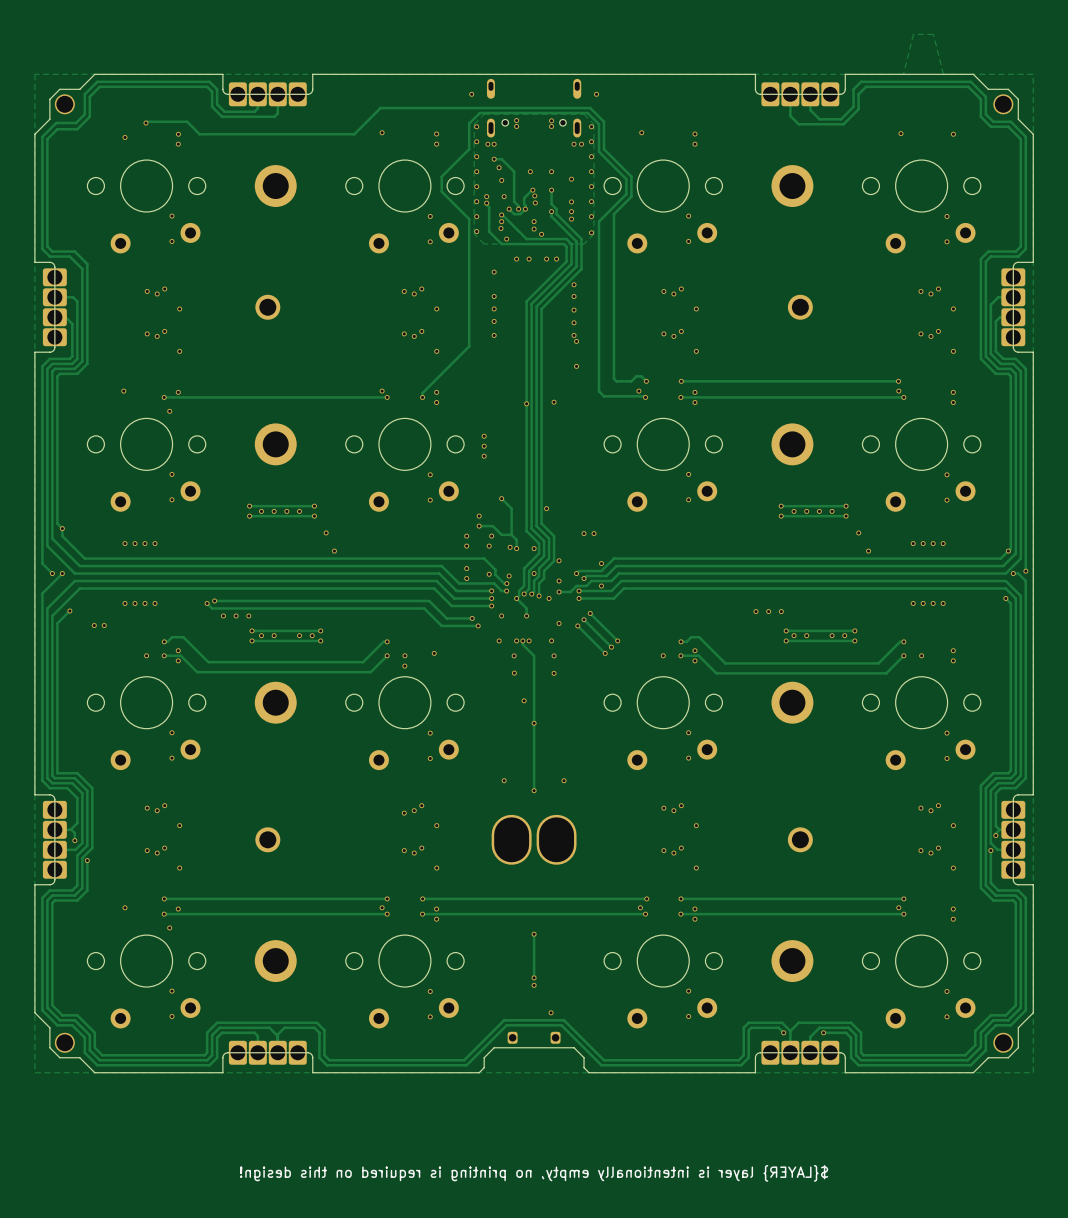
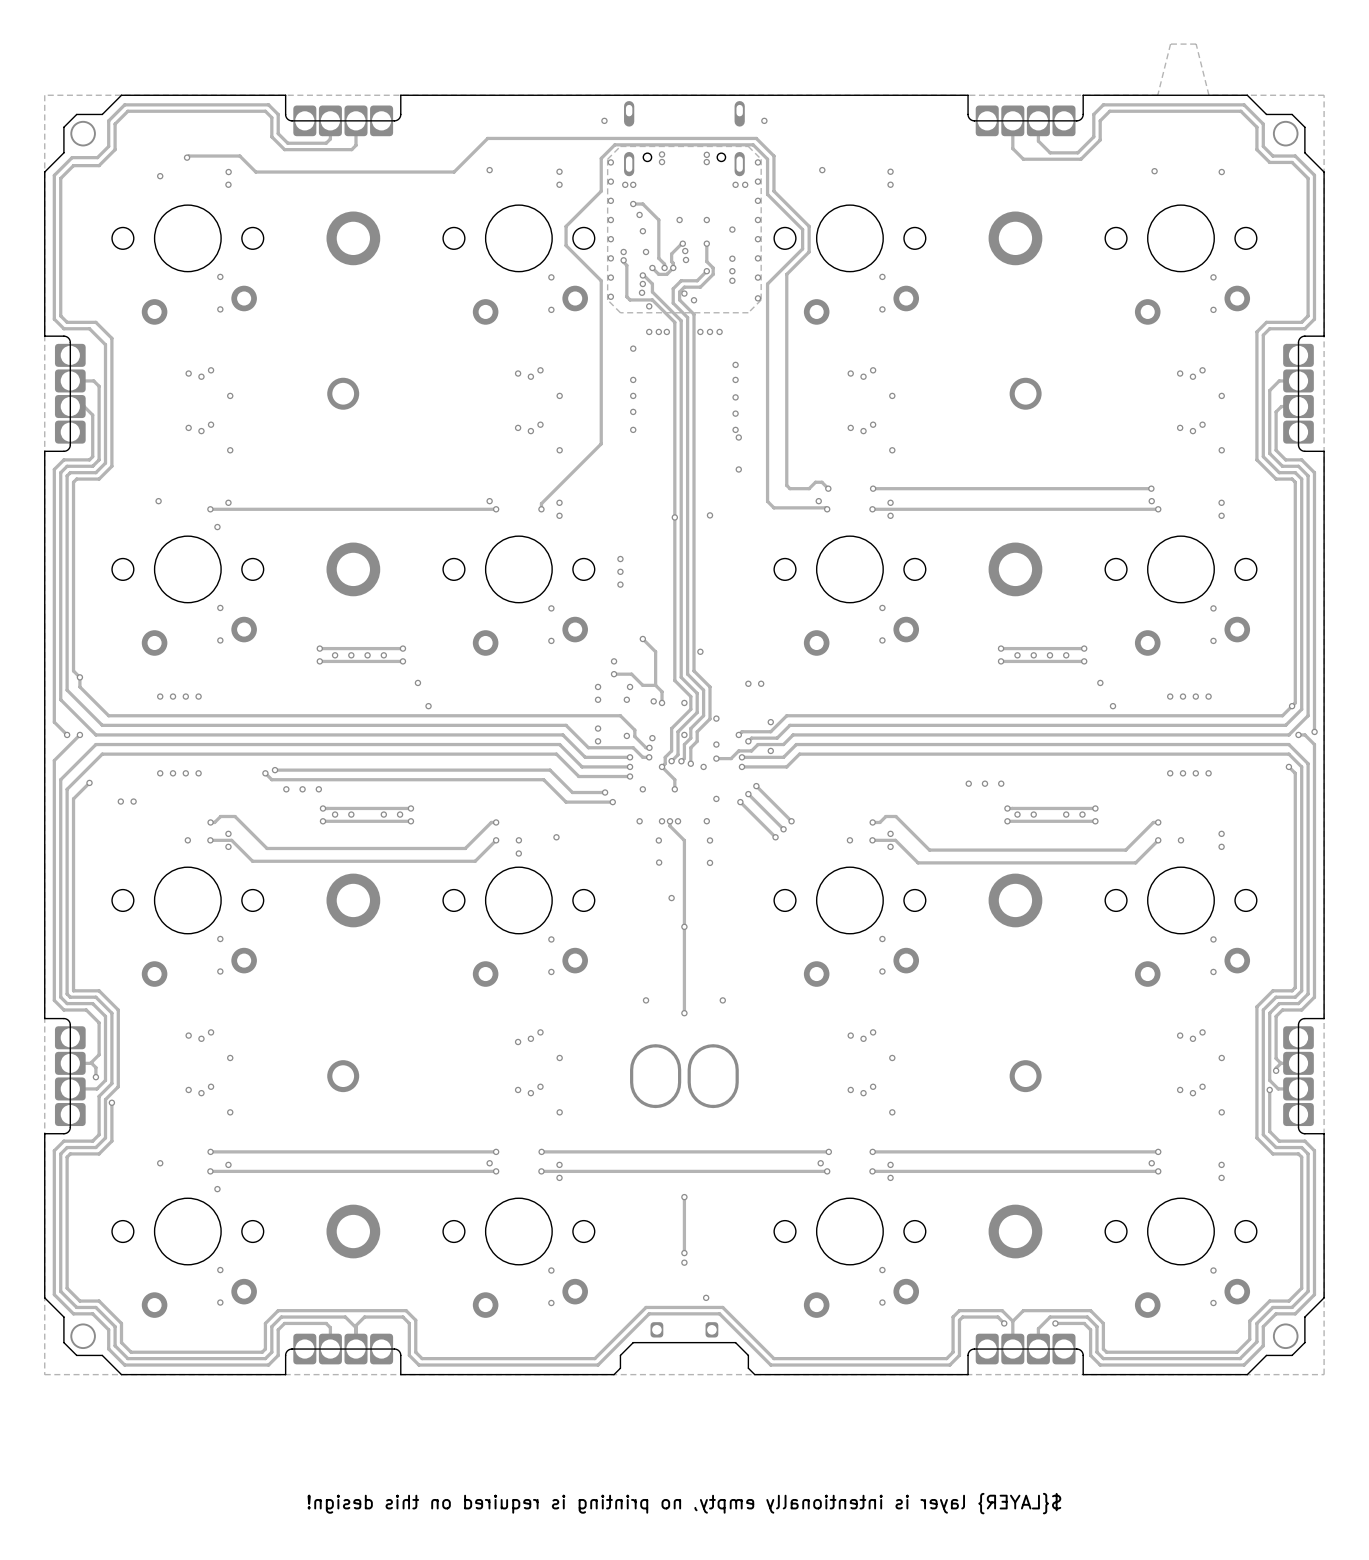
track: (551, 211) (551, 216) (576, 241) (576, 266) (536, 306) -> (706, 271) (697, 280) (681, 280) (673, 288) (673, 303) (687, 317) (687, 392)
track: (556, 214) (581, 239) (581, 269) (541, 308) -> (713, 274) (700, 287) (684, 287) (679, 291) (679, 299) (694, 314) (694, 395)
track: (509, 221) (526, 239) (566, 239) (571, 244) (571, 264) (531, 303) -> (652, 283) (652, 291) (681, 320) (681, 389)
via: (534, 221) -> none
track: (491, 234) (501, 244) (564, 244) (566, 246) (566, 261) (526, 301) -> (630, 299) (652, 299) (674, 322) (674, 386)
via: none -> (649, 331)
via: none -> (658, 331)
via: (516, 259) -> none
via: none -> (666, 331)
via: (529, 259) -> none
via: none -> (709, 331)
via: (556, 259) -> none
via: none -> (719, 331)

